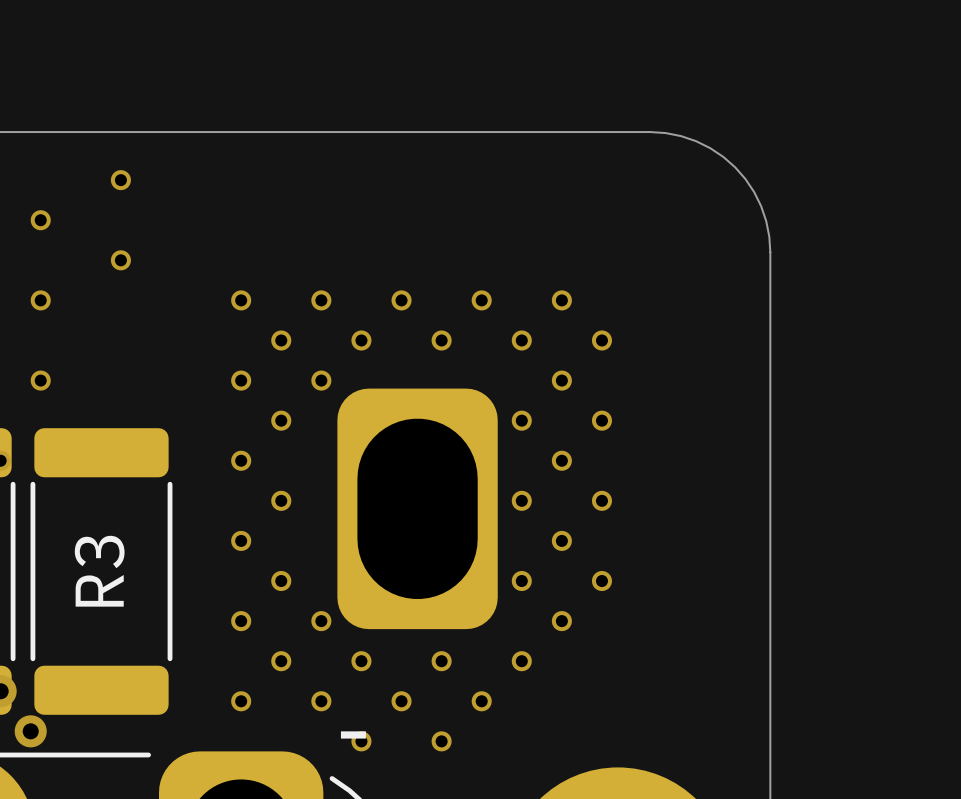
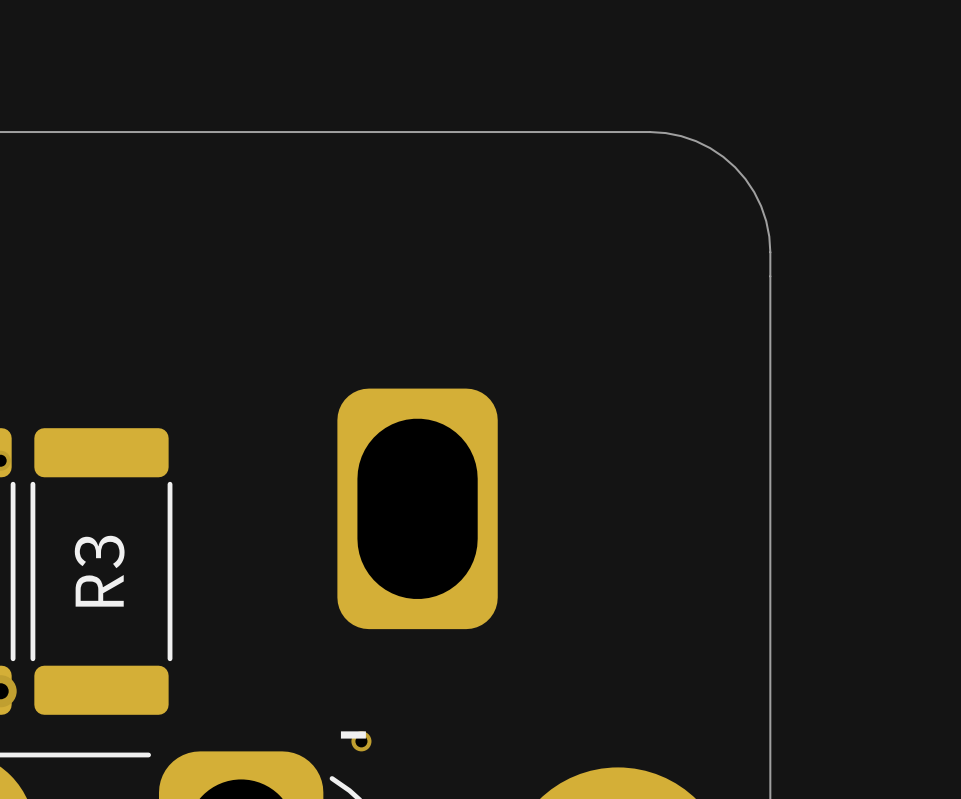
via: (120, 180) -> none
via: (40, 220) -> none
via: (120, 260) -> none
via: (40, 300) -> none
via: (241, 300) -> none
via: (321, 300) -> none
via: (401, 300) -> none
via: (481, 300) -> none
via: (561, 300) -> none
via: (281, 340) -> none
via: (361, 340) -> none
via: (441, 340) -> none
via: (521, 340) -> none
via: (601, 340) -> none
via: (40, 380) -> none
via: (241, 380) -> none
via: (321, 380) -> none
via: (561, 380) -> none
via: (281, 420) -> none
via: (521, 420) -> none
via: (601, 420) -> none
via: (241, 460) -> none
via: (561, 460) -> none
via: (281, 500) -> none
via: (521, 500) -> none
via: (601, 500) -> none
via: (241, 540) -> none
via: (561, 540) -> none
via: (281, 581) -> none
via: (521, 581) -> none
via: (601, 581) -> none
via: (241, 621) -> none
via: (321, 621) -> none
via: (561, 621) -> none
via: (281, 661) -> none
via: (361, 661) -> none
via: (441, 661) -> none
via: (521, 661) -> none
via: (241, 701) -> none
via: (321, 701) -> none
via: (401, 701) -> none
via: (481, 701) -> none
via: (30, 731) -> none
via: (441, 741) -> none

